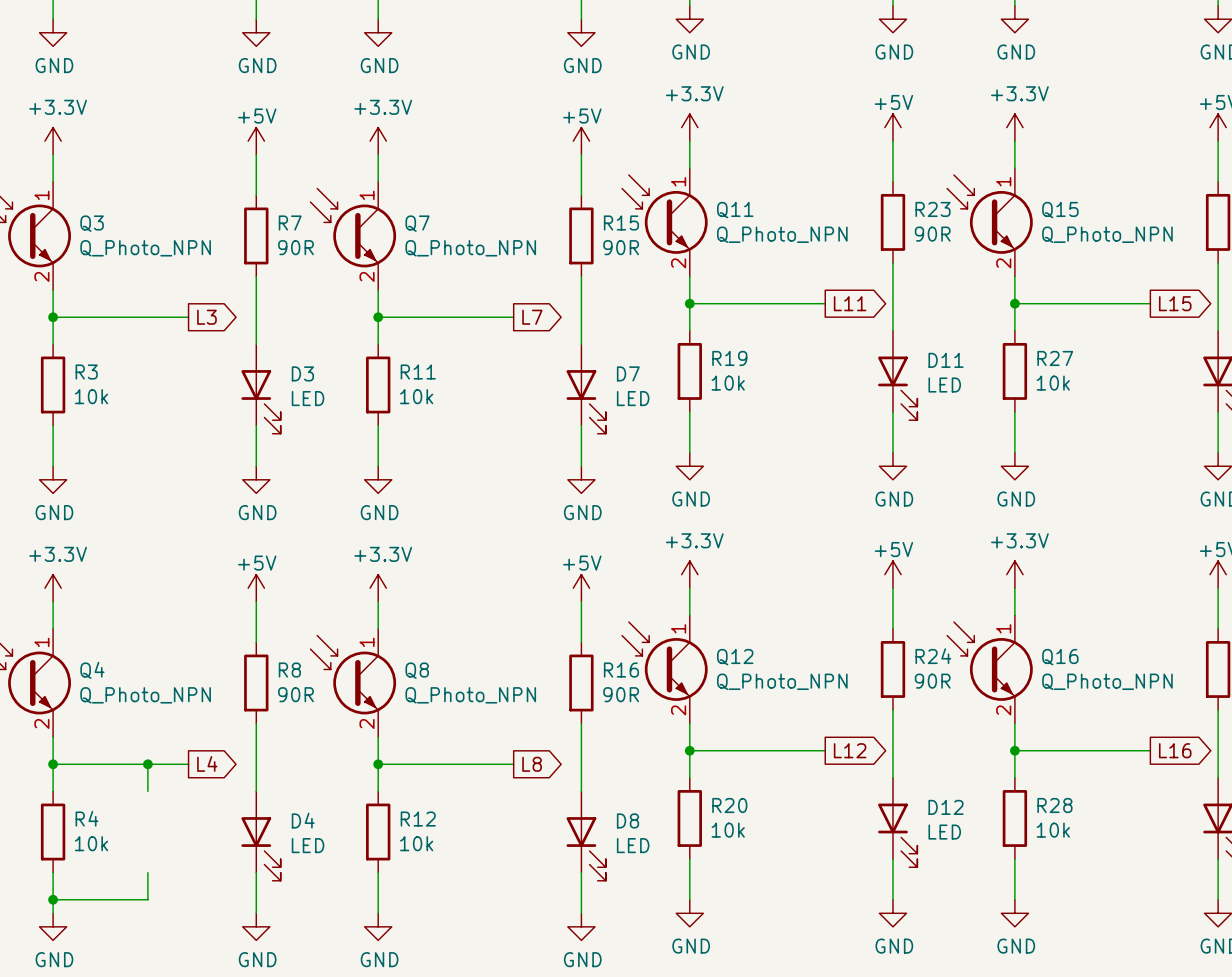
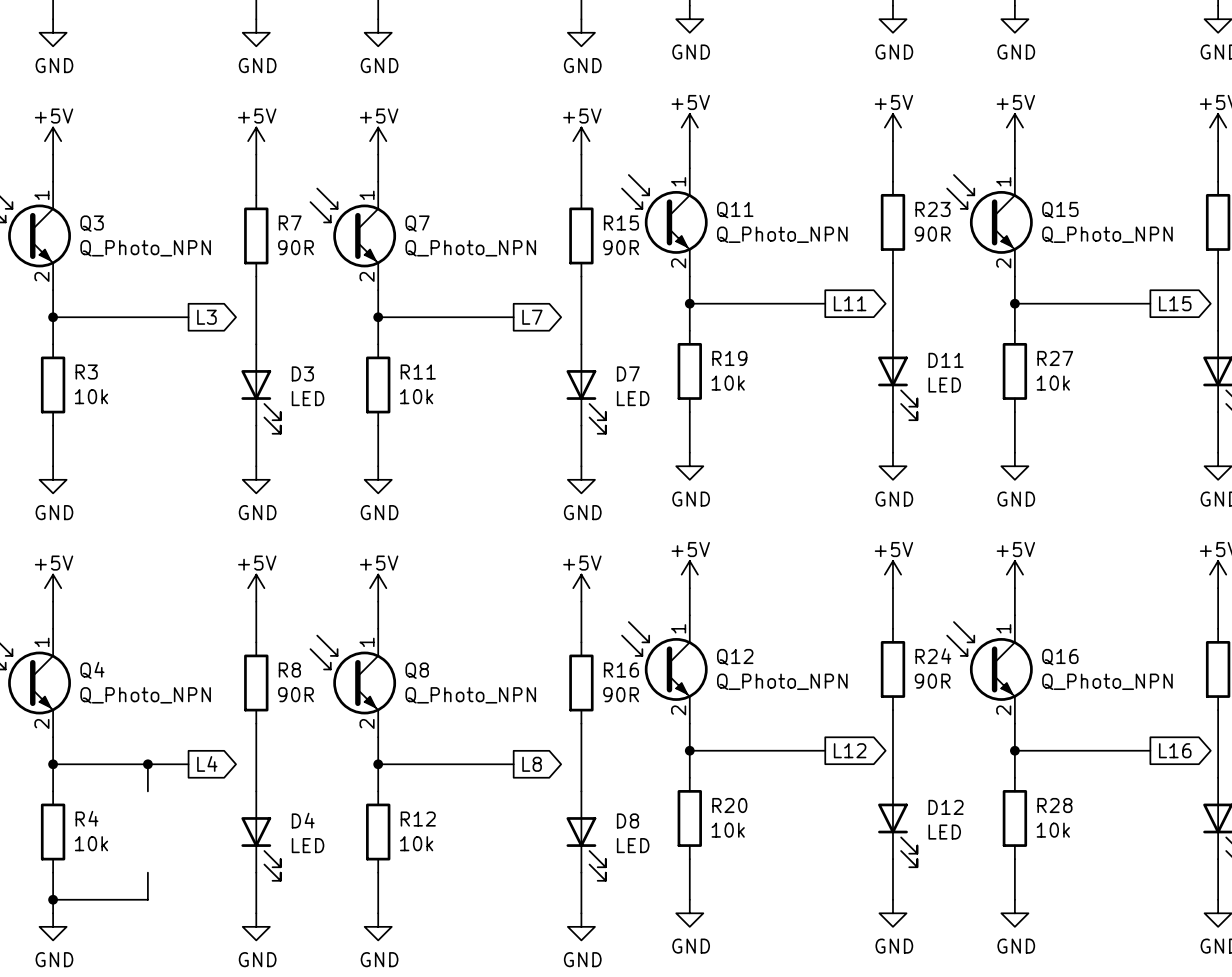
power symbol: +3.3V (689, 127) -> +5V (689, 127)
power symbol: +3.3V (1014, 127) -> +5V (1014, 127)
power symbol: +3.3V (53, 141) -> +5V (53, 141)
power symbol: +3.3V (378, 141) -> +5V (378, 141)
power symbol: +3.3V (689, 574) -> +5V (689, 574)
power symbol: +3.3V (1014, 574) -> +5V (1014, 574)
power symbol: +3.3V (53, 588) -> +5V (53, 588)
power symbol: +3.3V (378, 588) -> +5V (378, 588)

